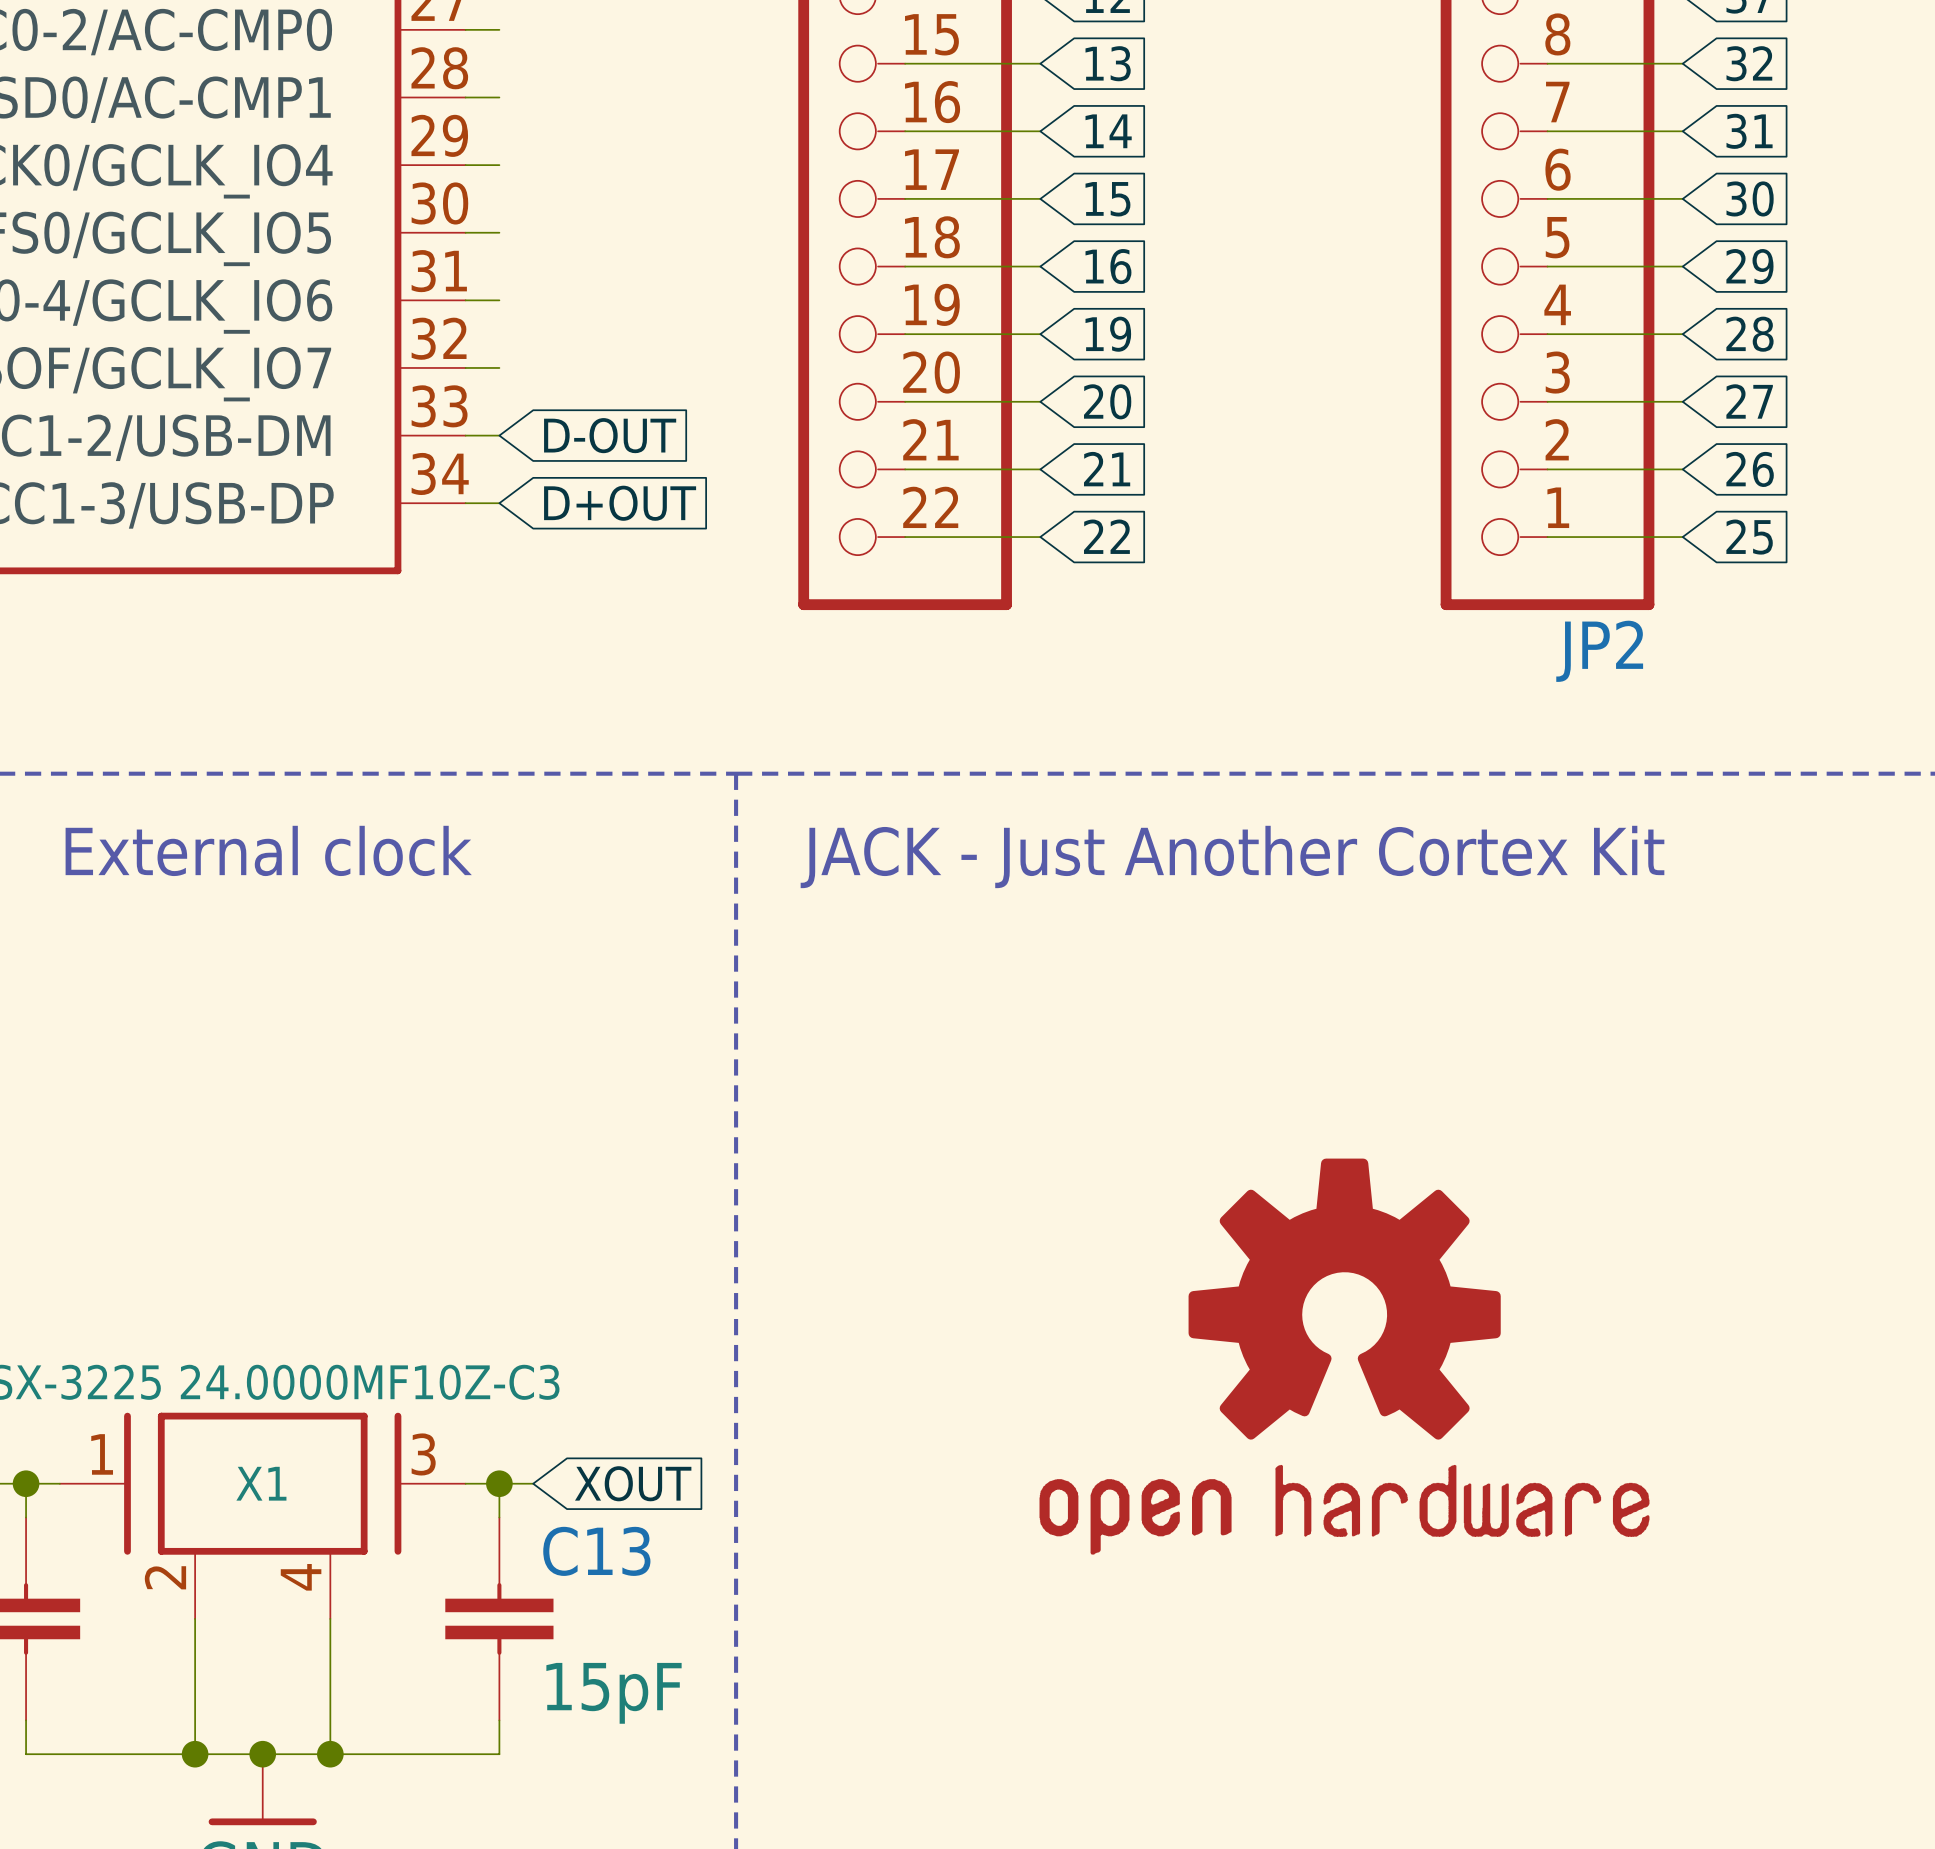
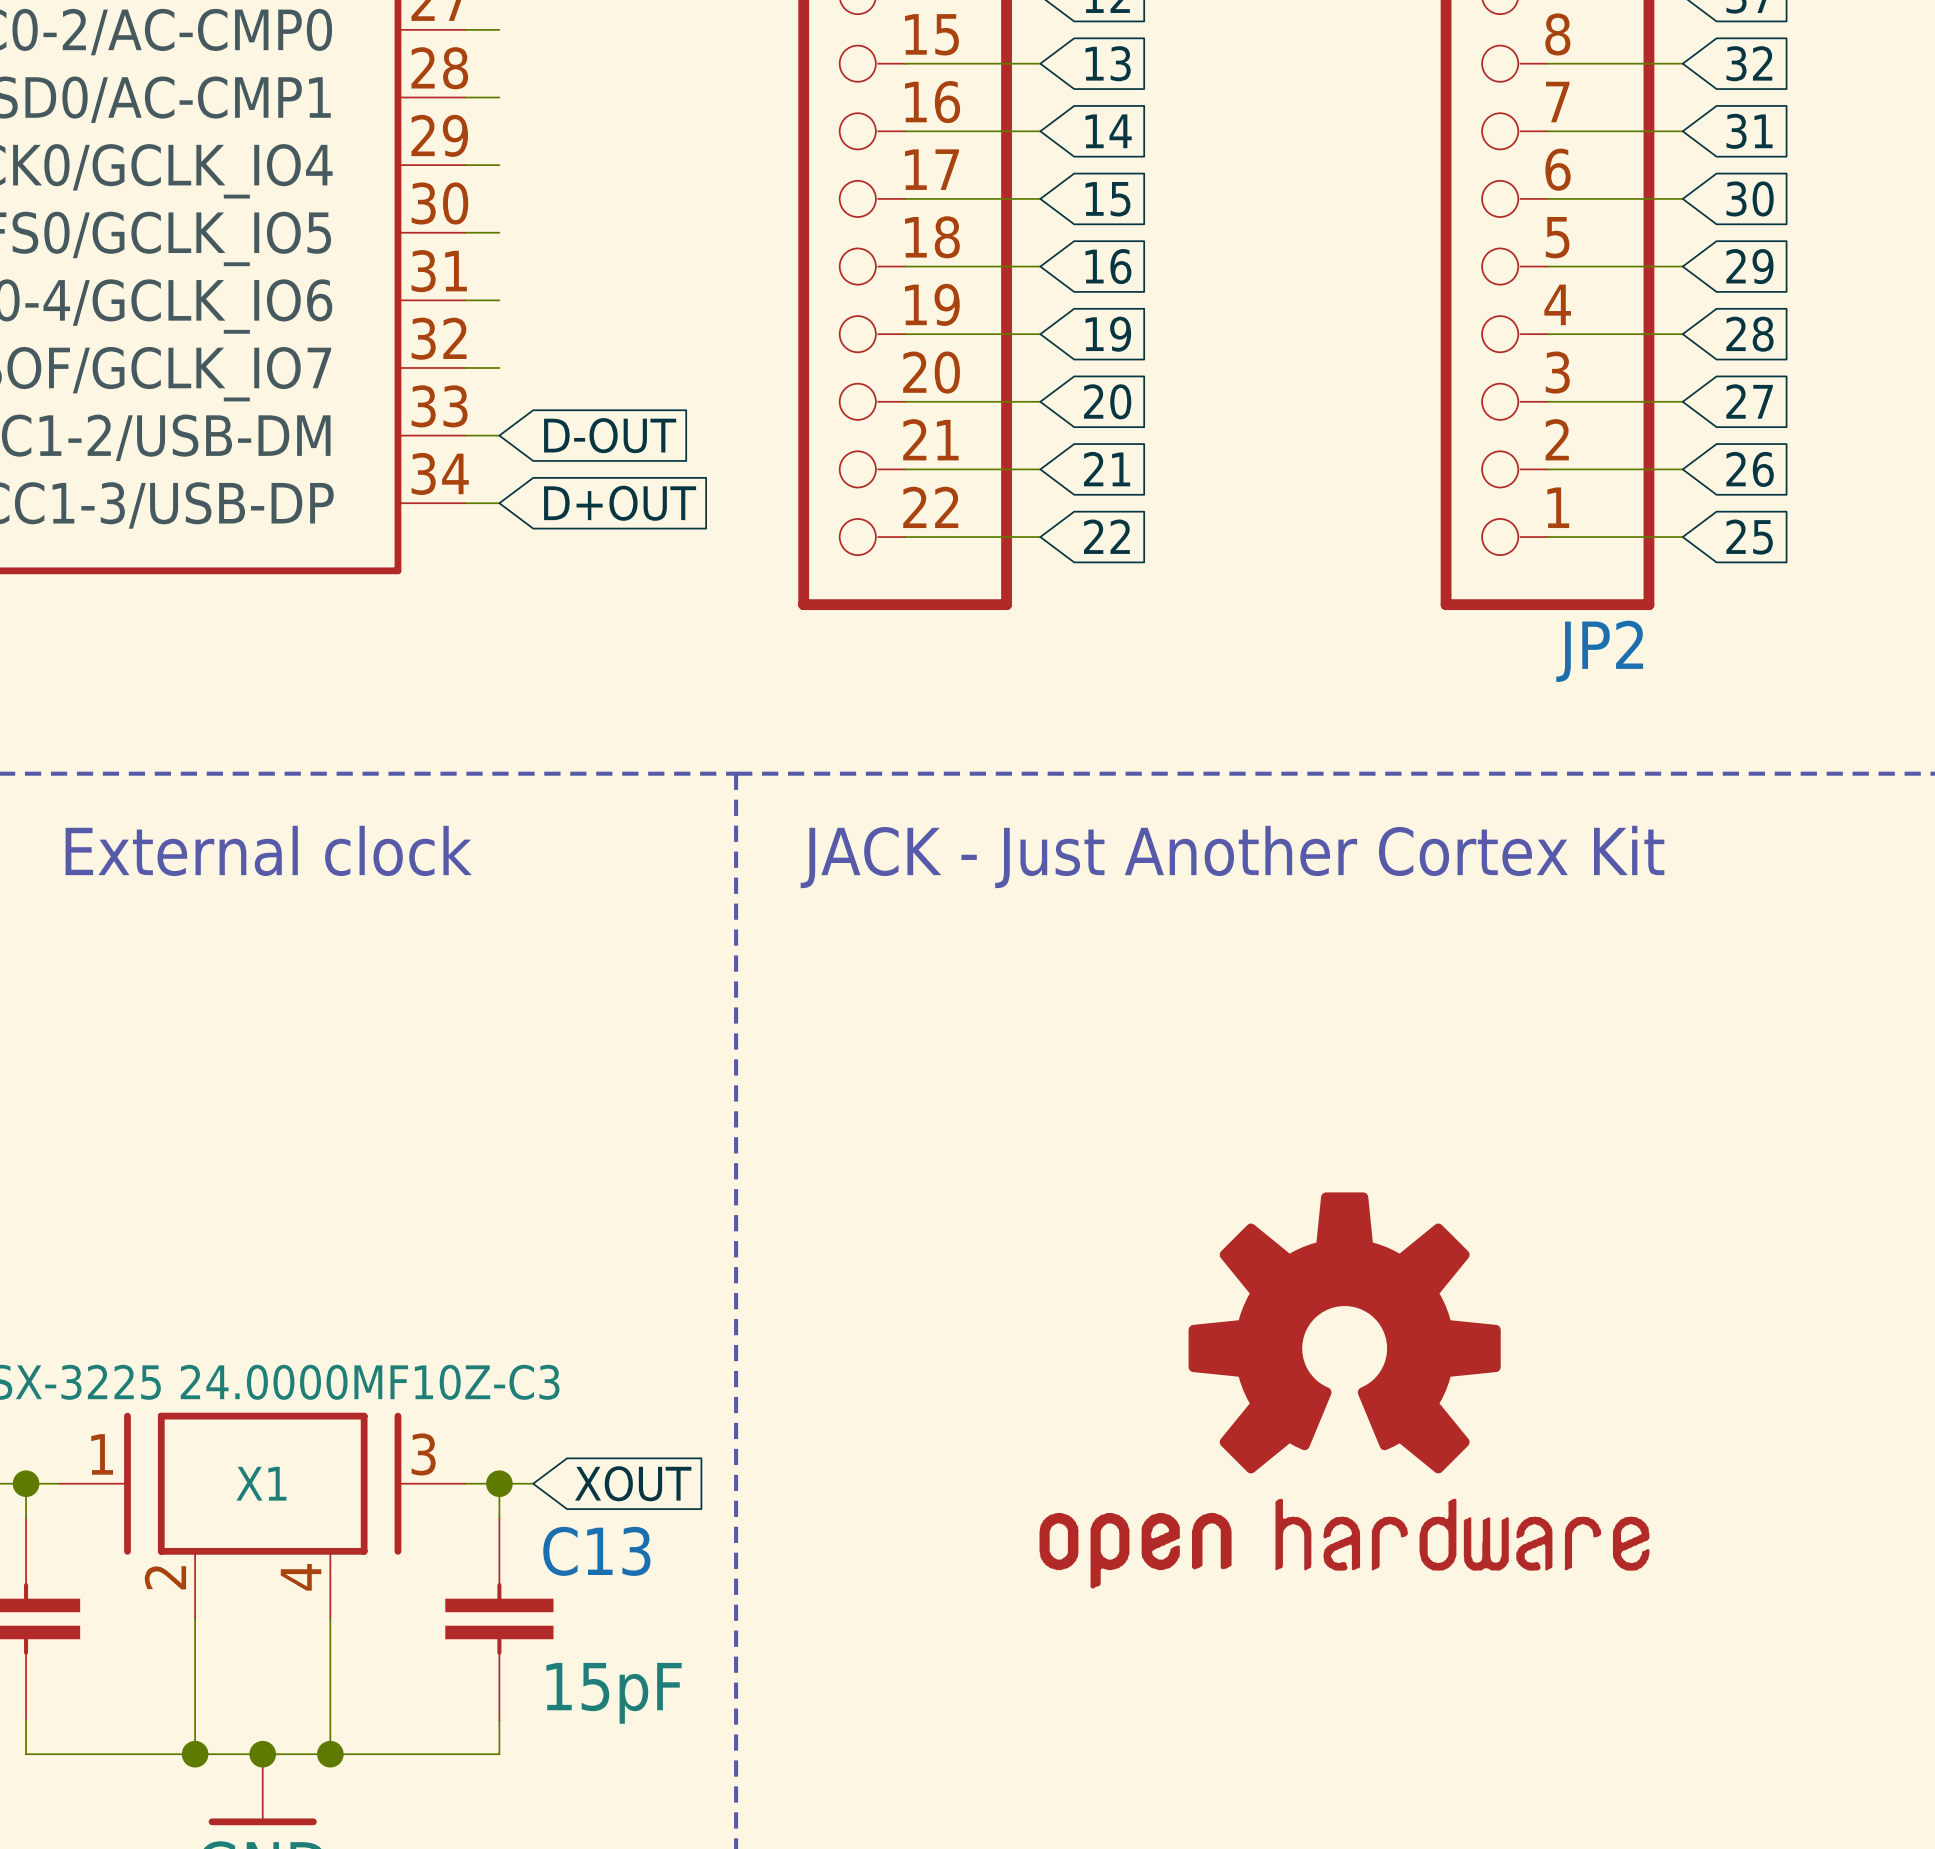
part position: (1344, 1356) -> (1344, 1390)

